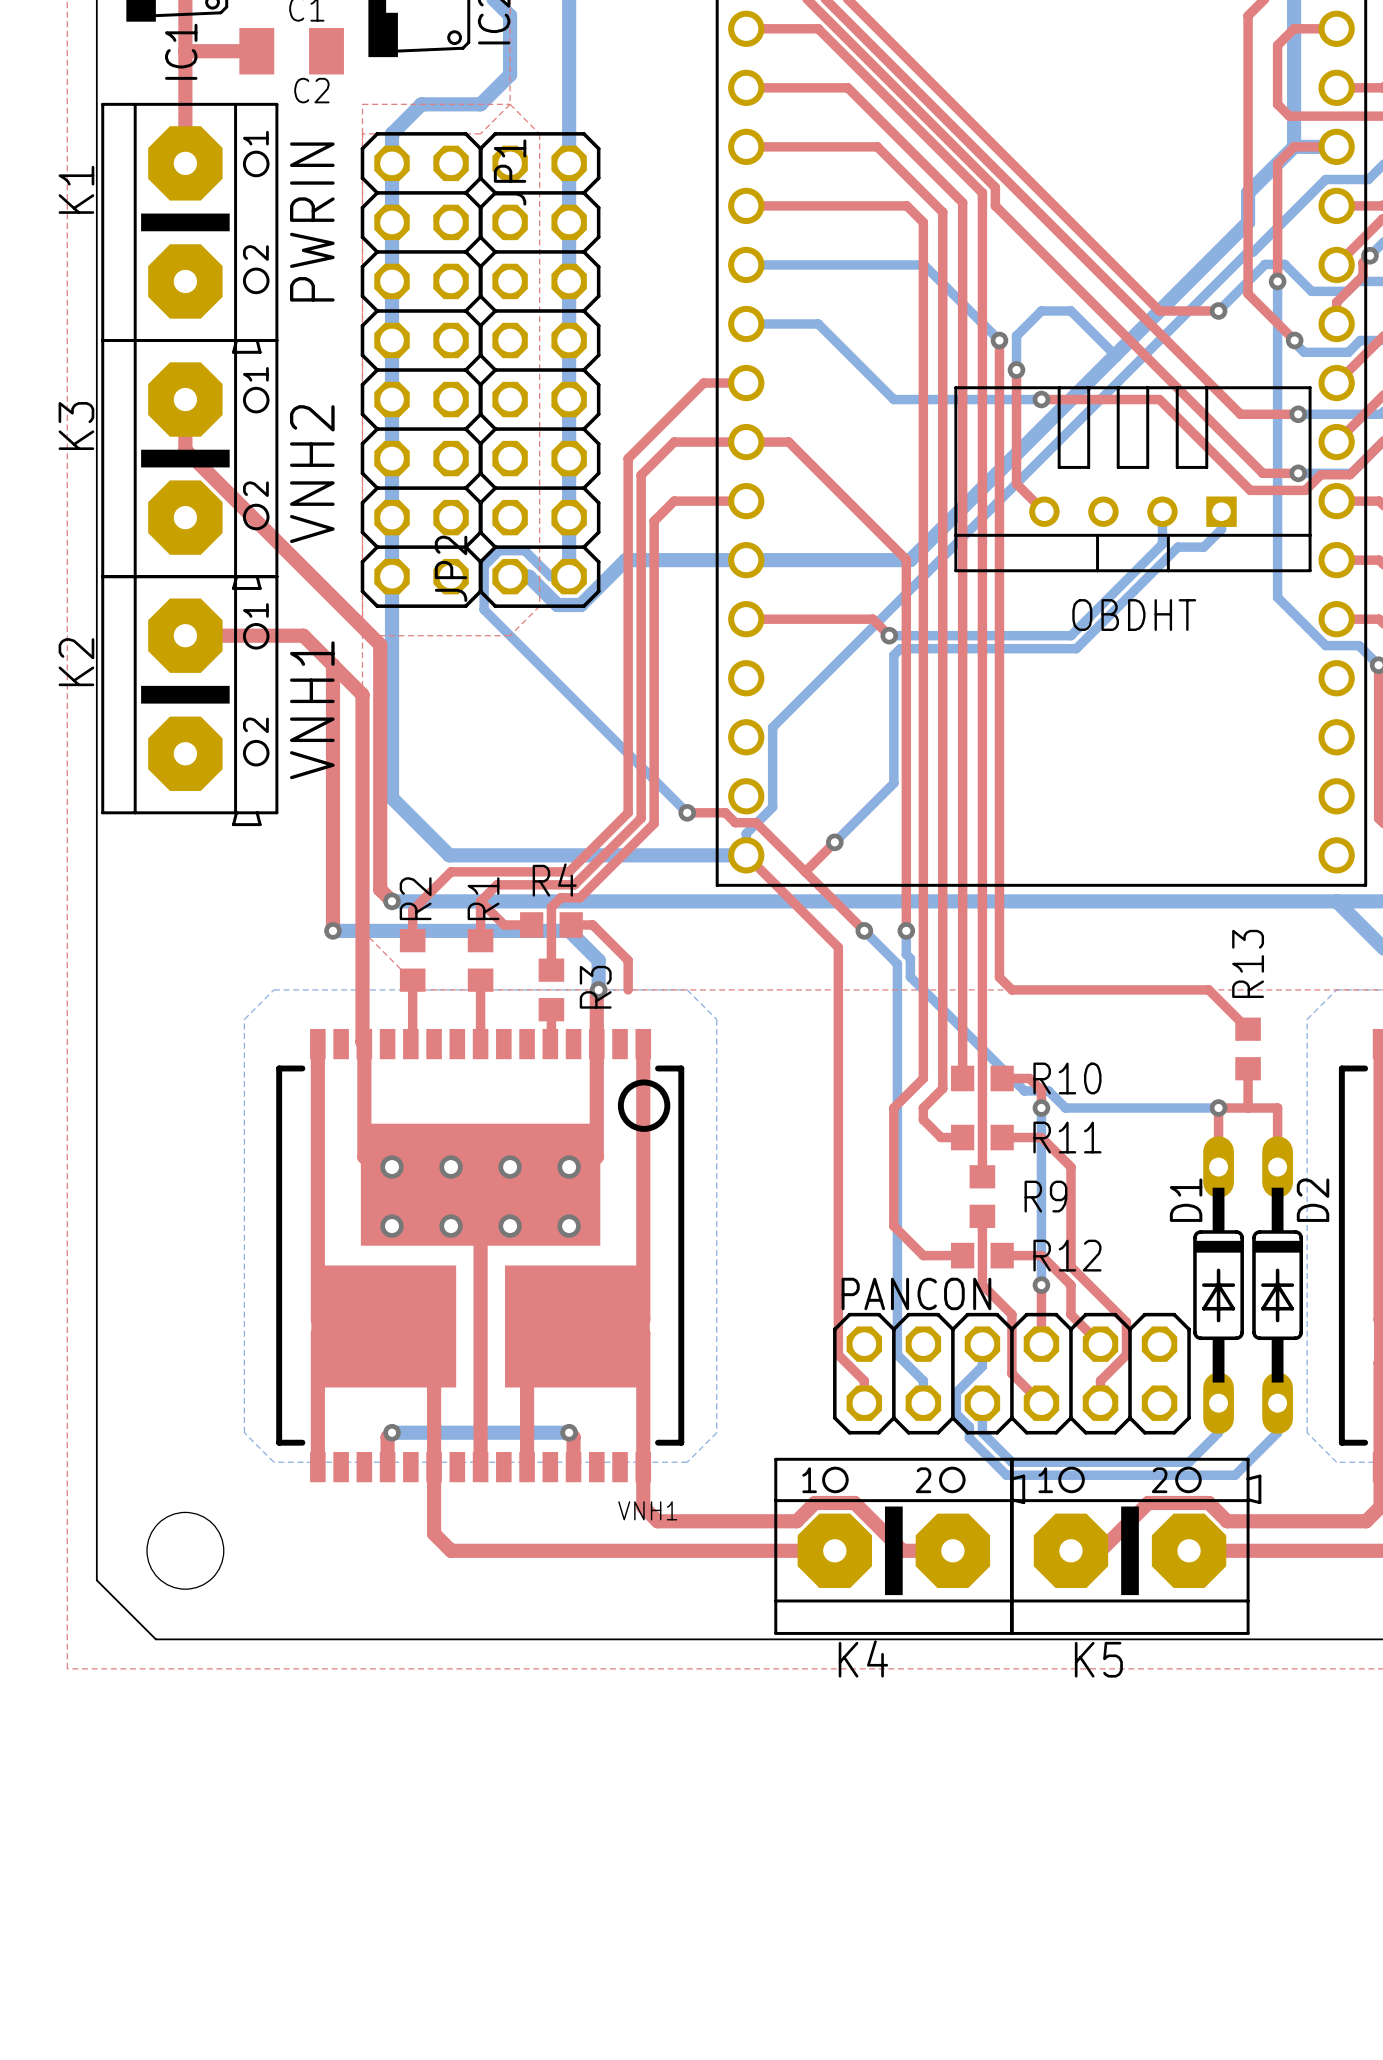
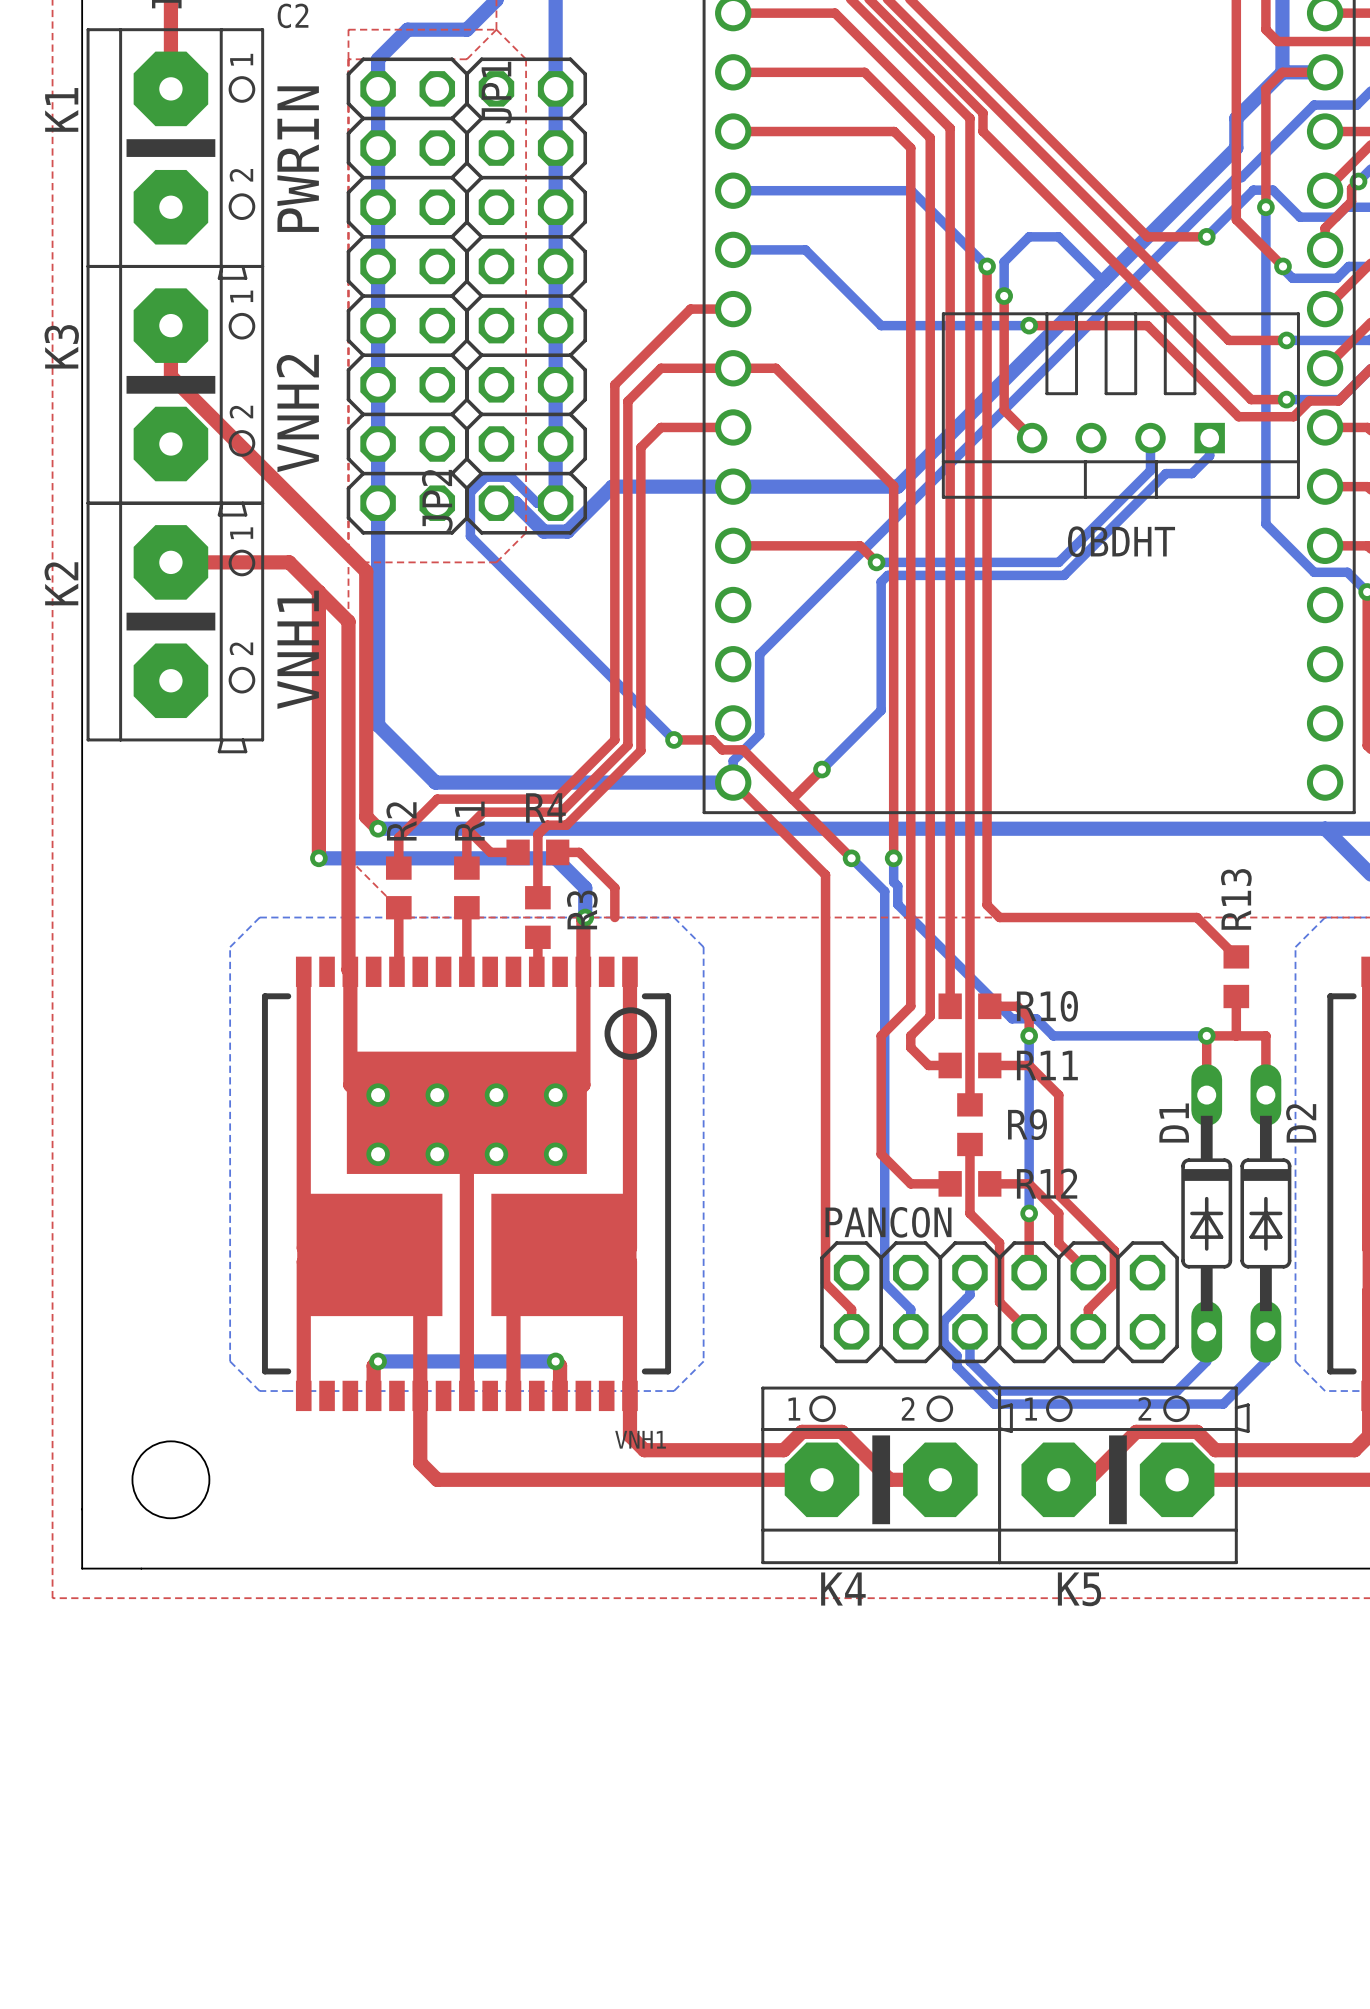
board edge: (96, 1580) (155, 1639) -> (82, 1509) (82, 1568) (141, 1568)

